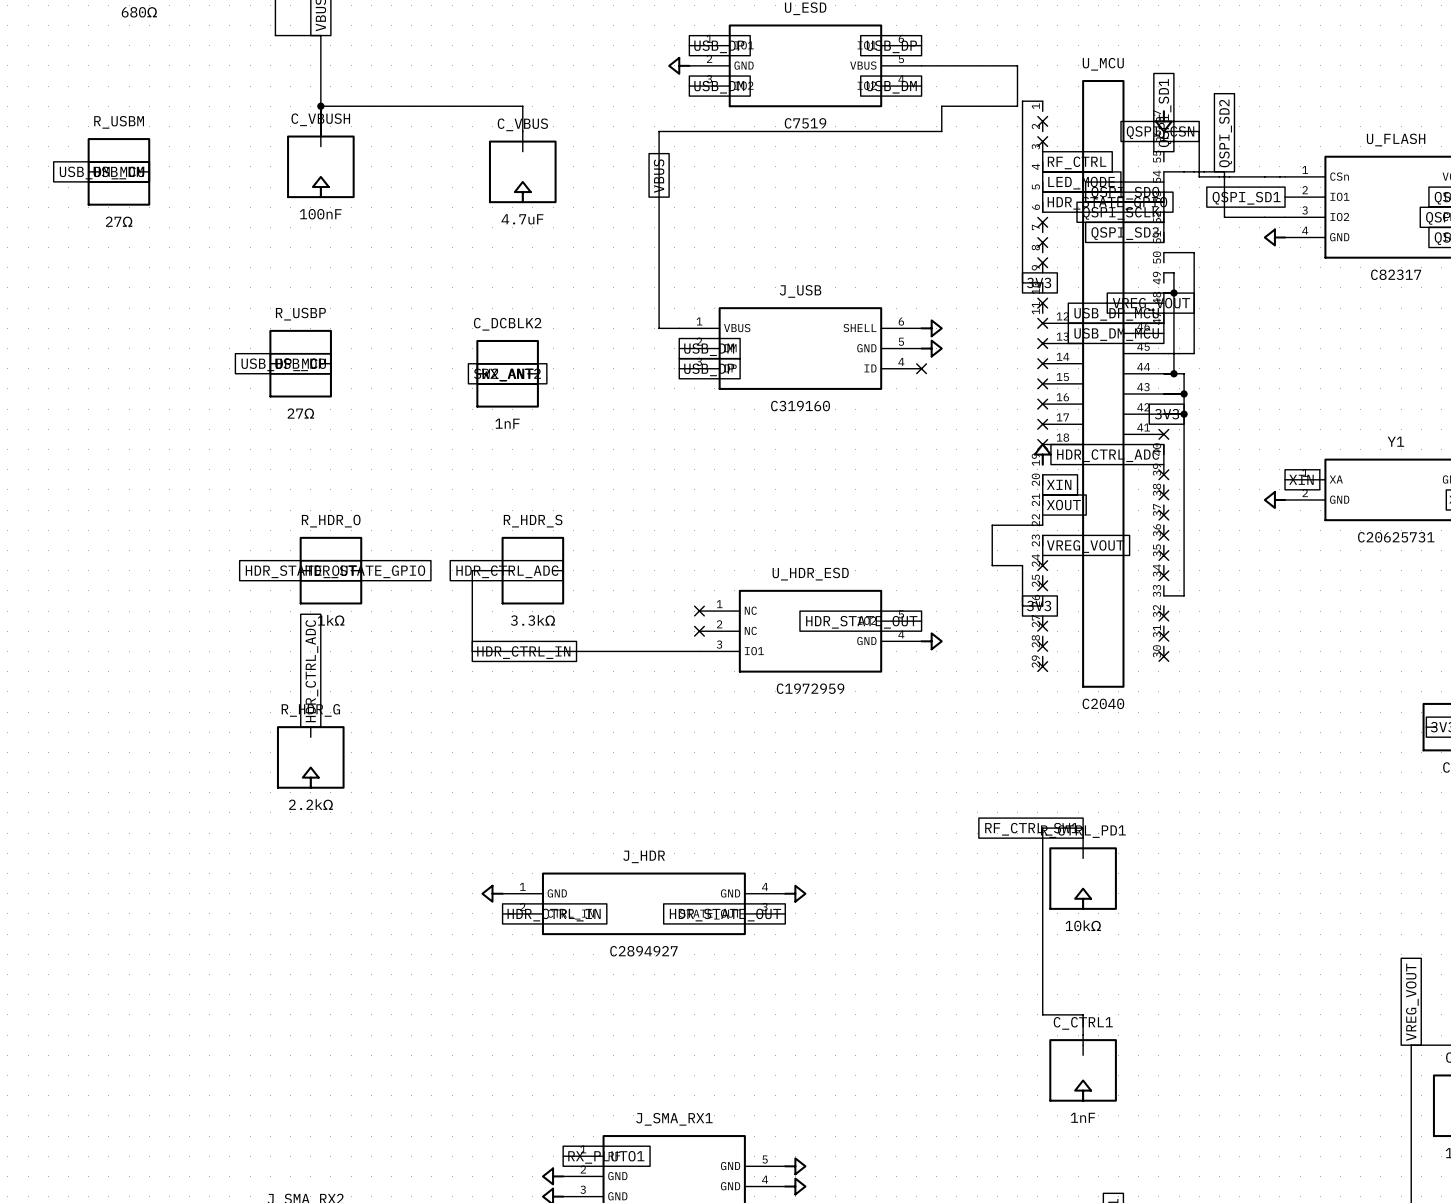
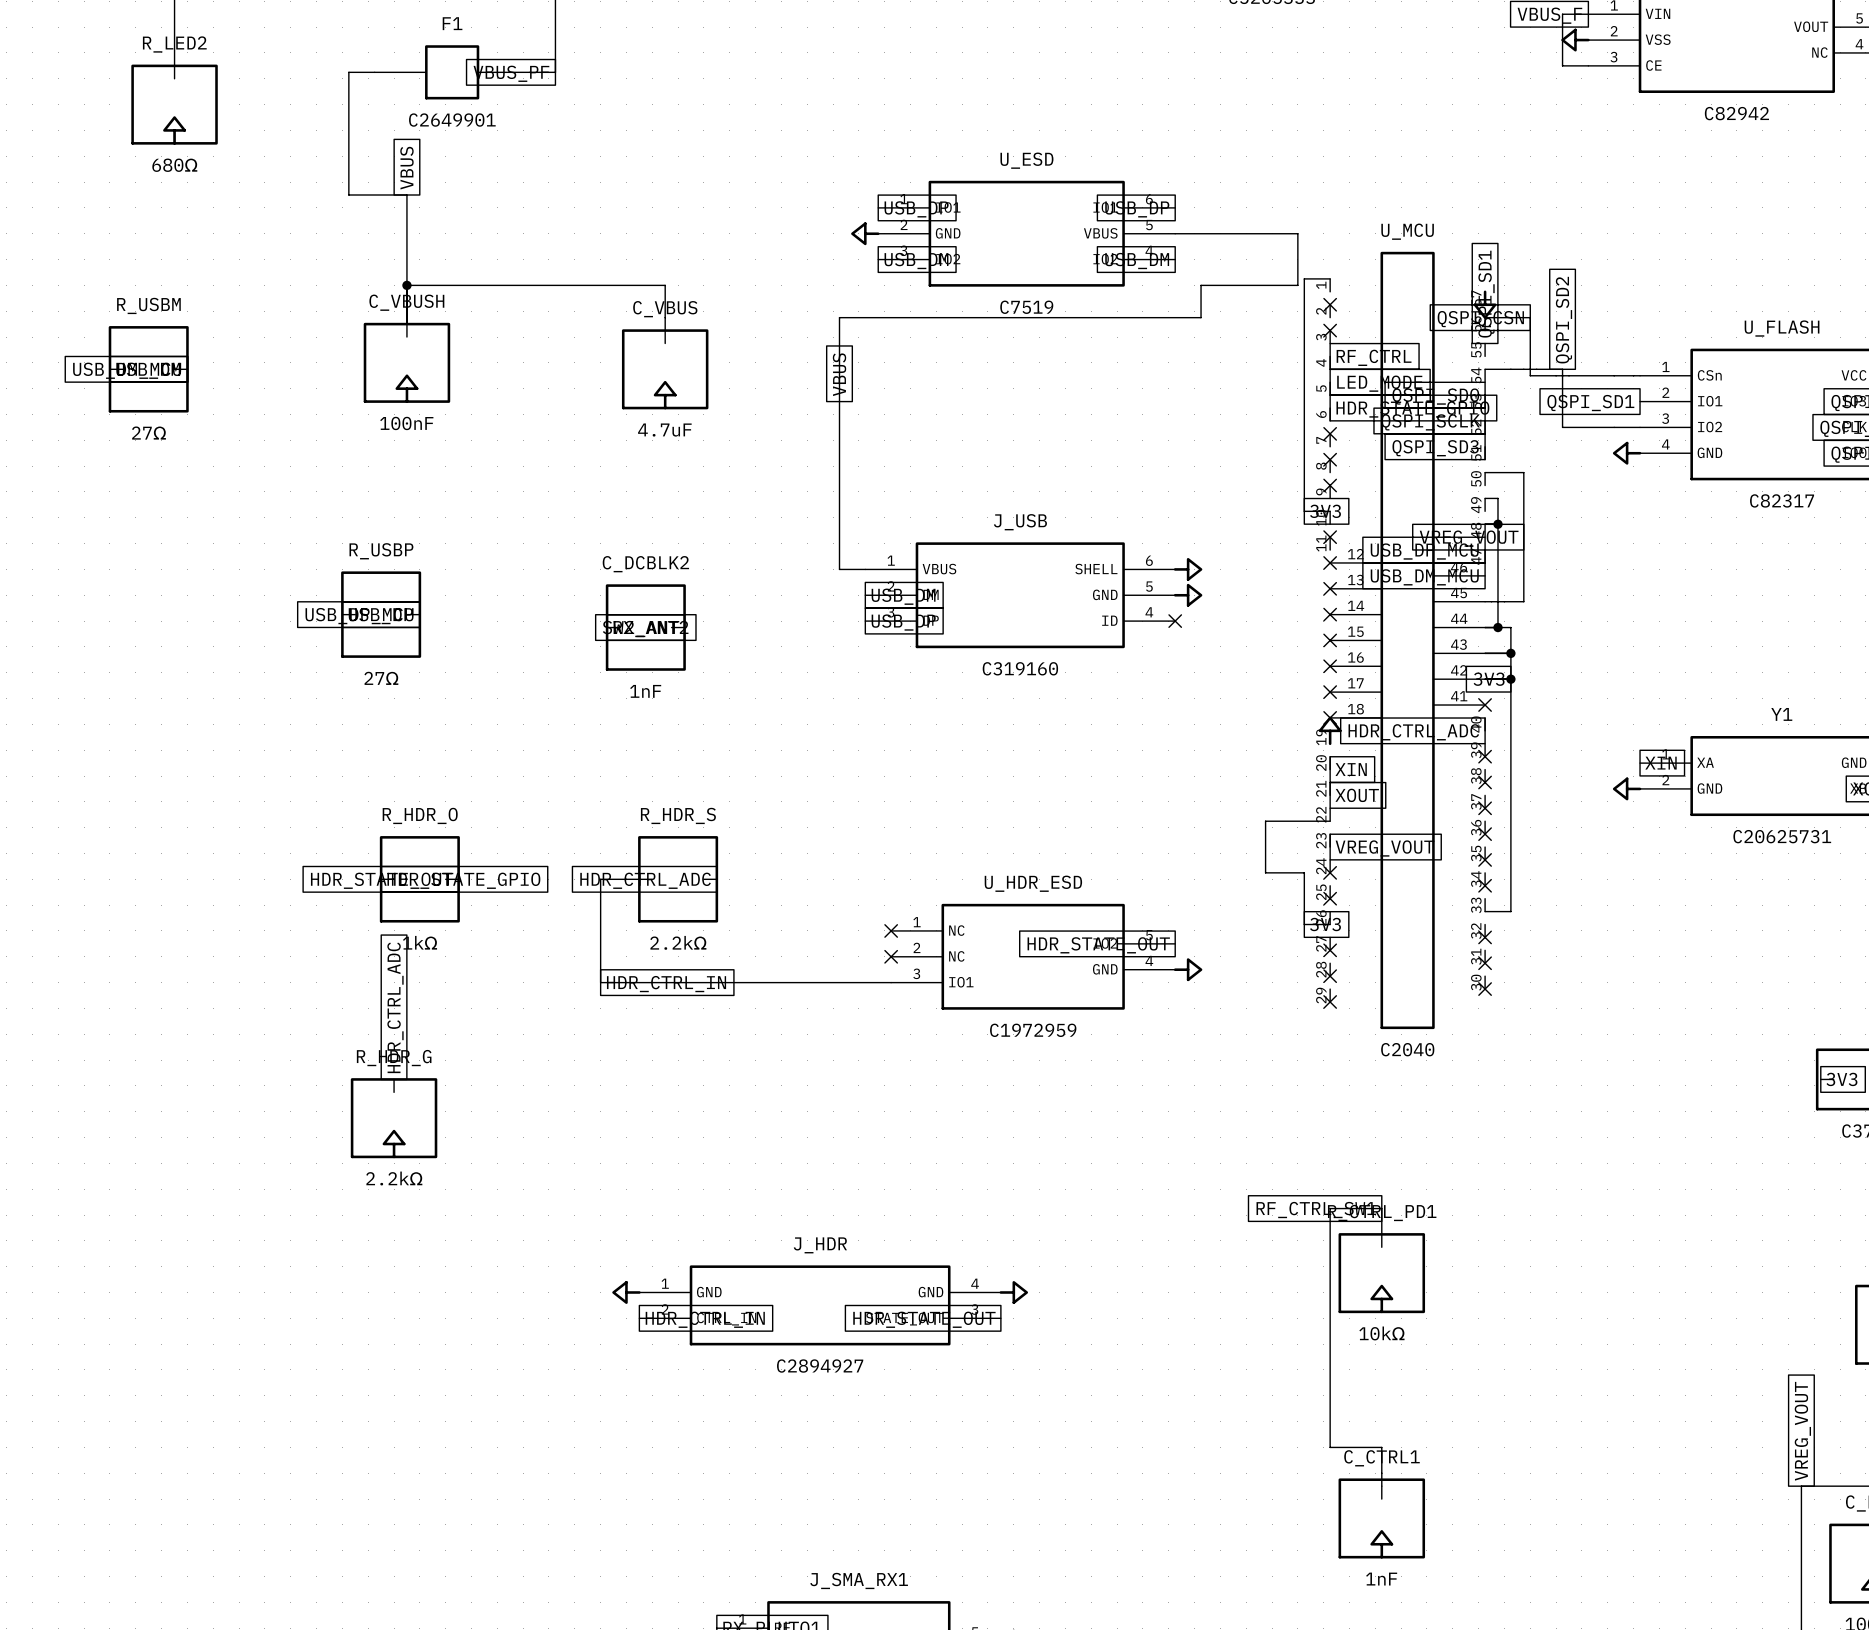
R_HDR_S value: 3.3kΩ (532, 620) -> 2.2kΩ (678, 942)

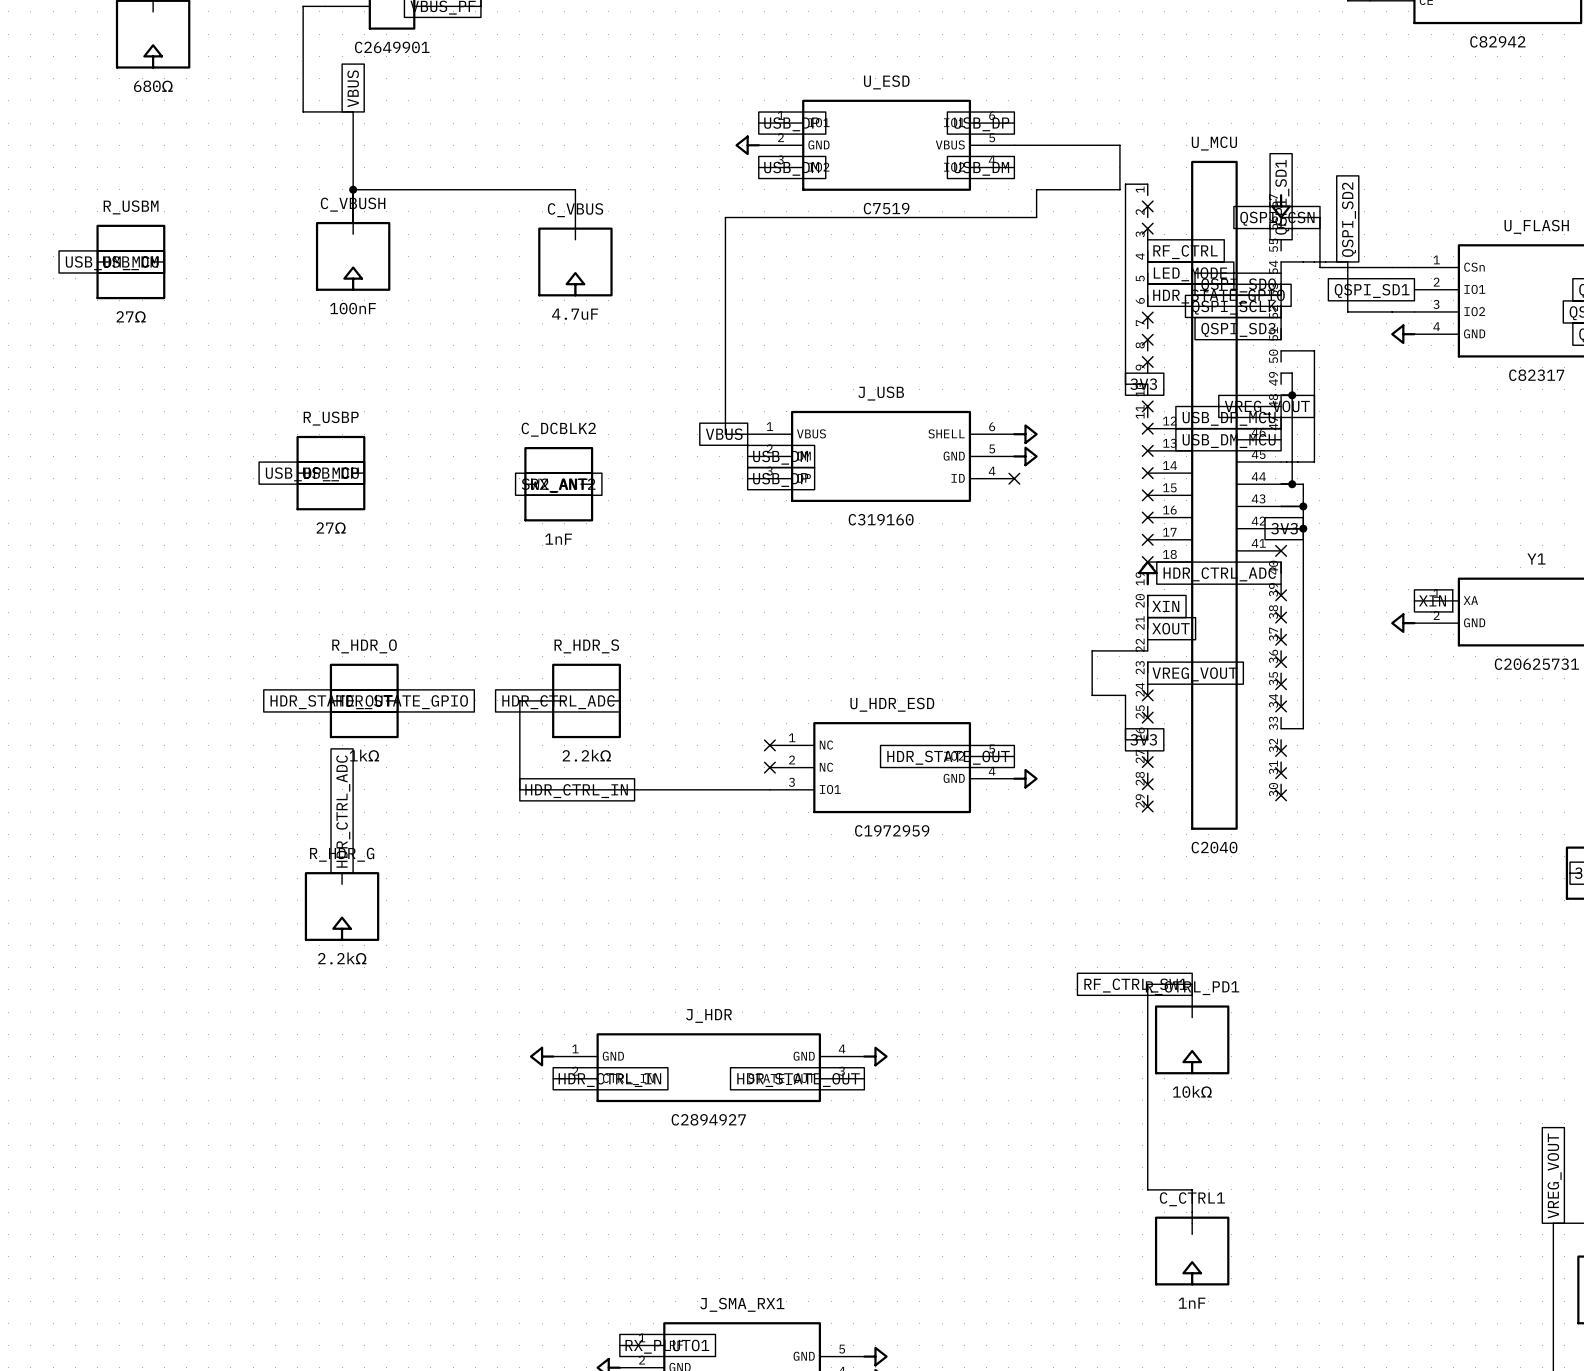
global label rotation: 0° (839, 374) -> 90° counterclockwise (724, 434)
global label position: VBUS (839, 374) -> VBUS (724, 434)

